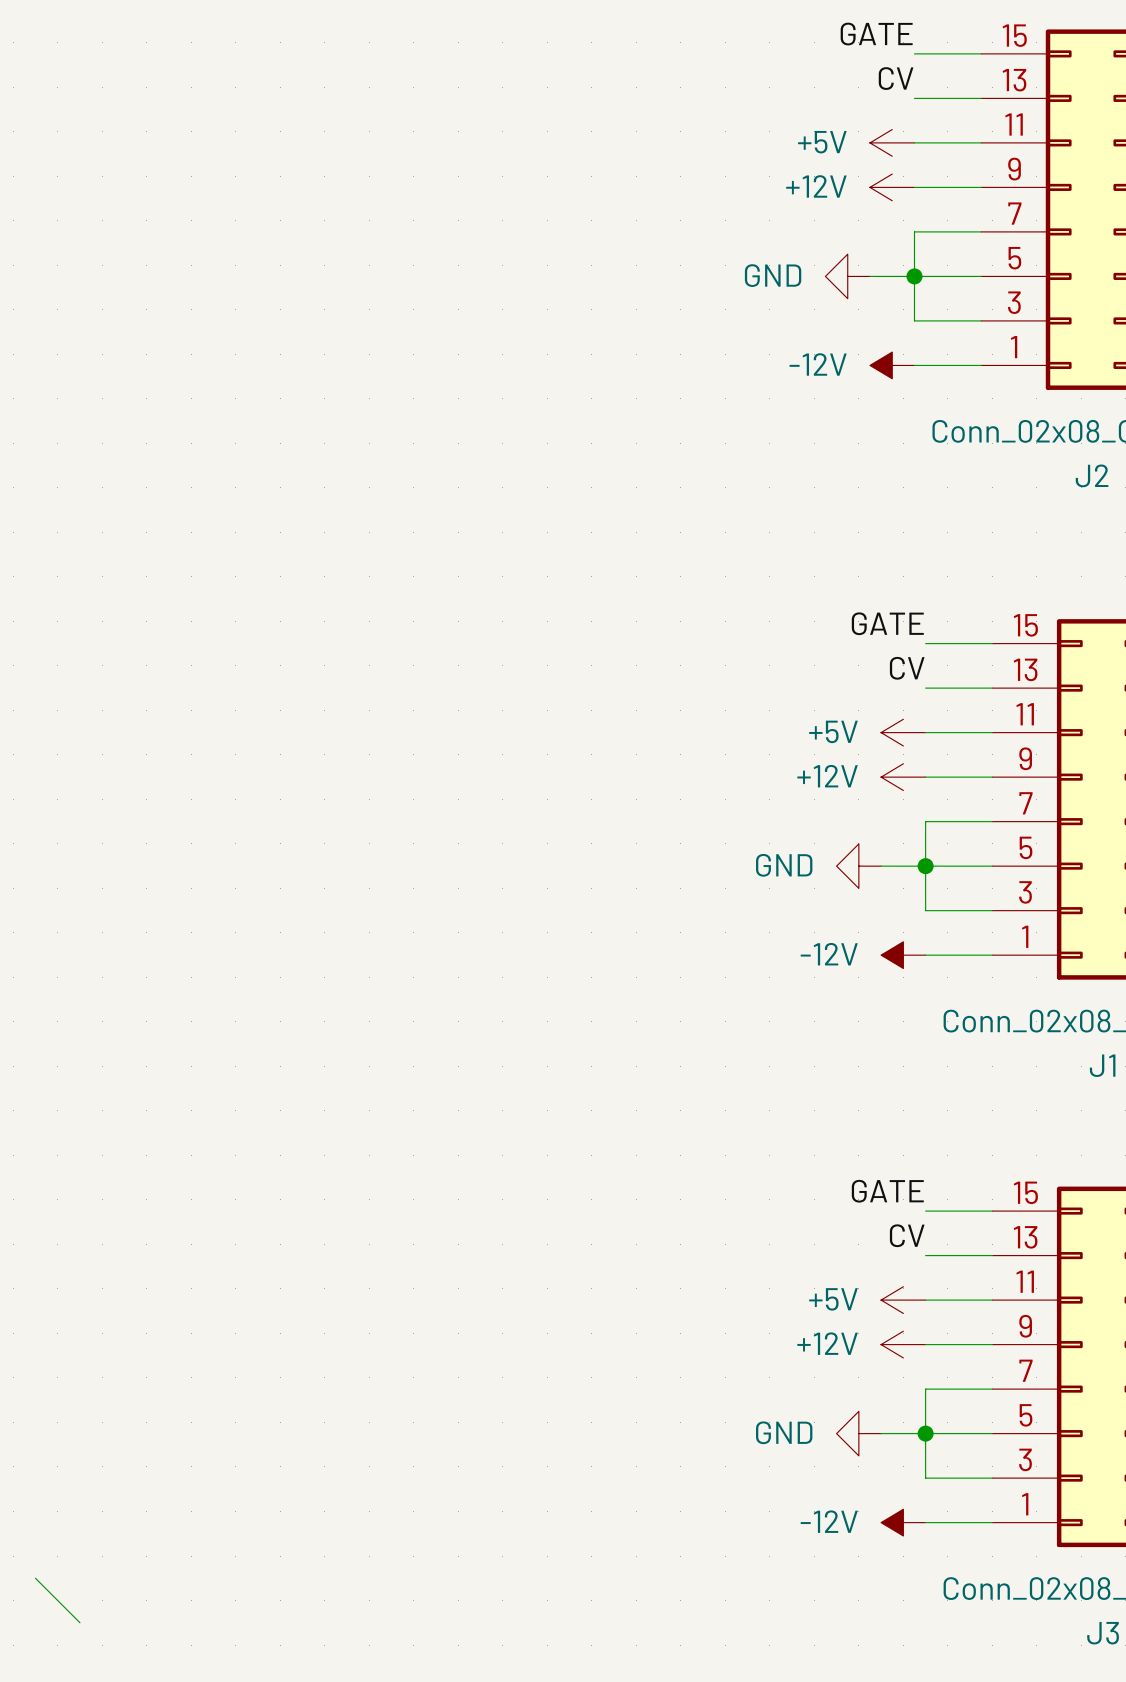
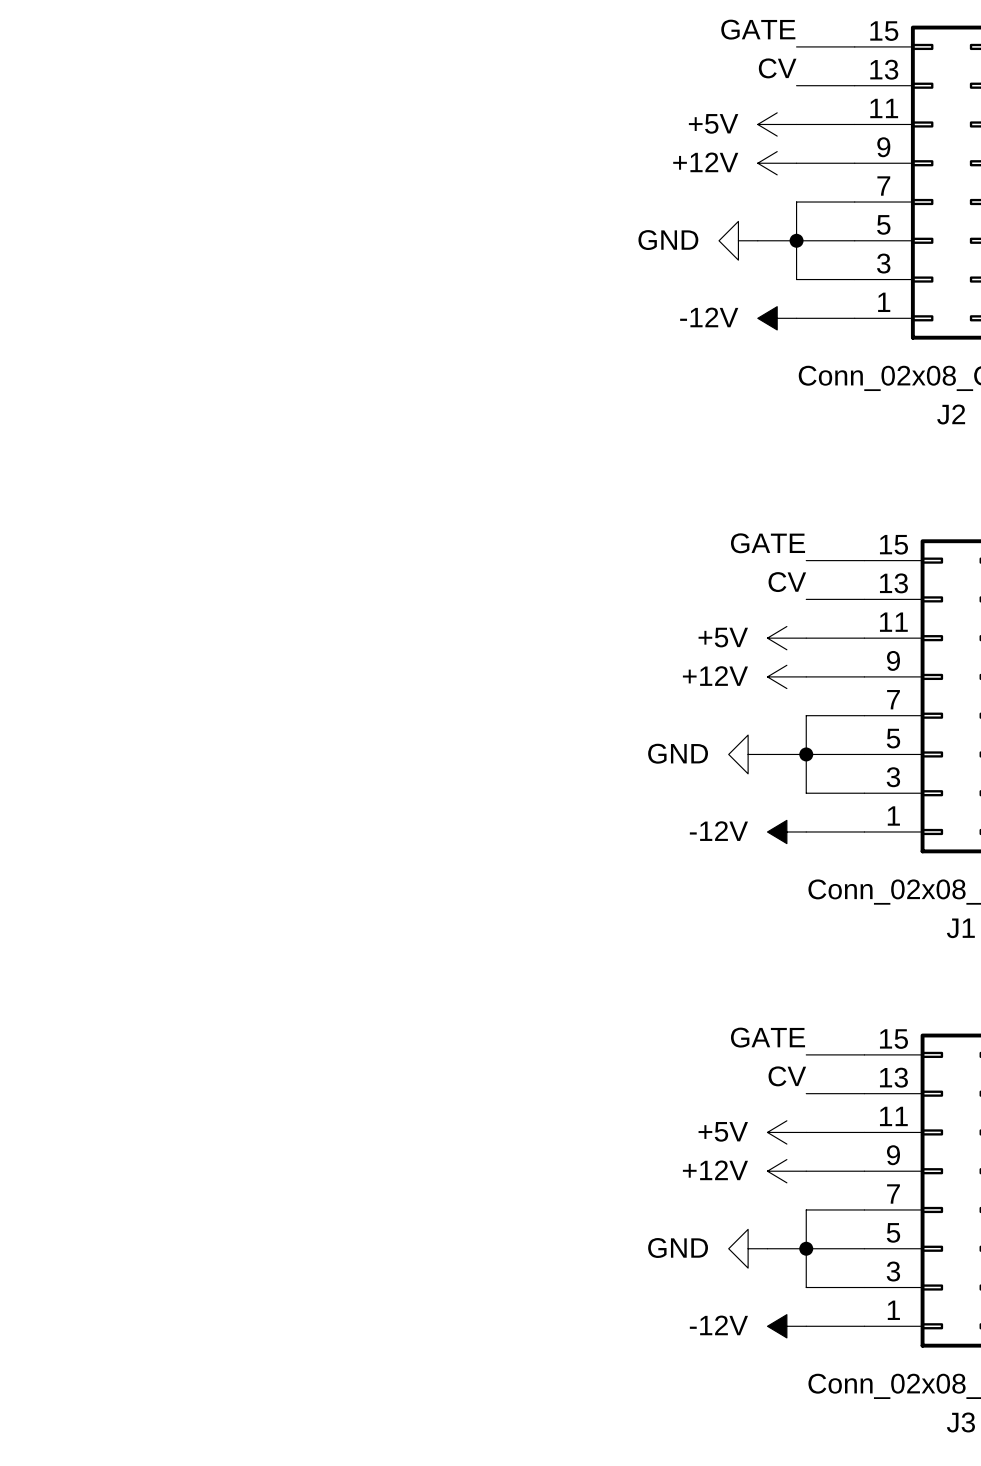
wire: (35, 1578) (79, 1622) -> none

